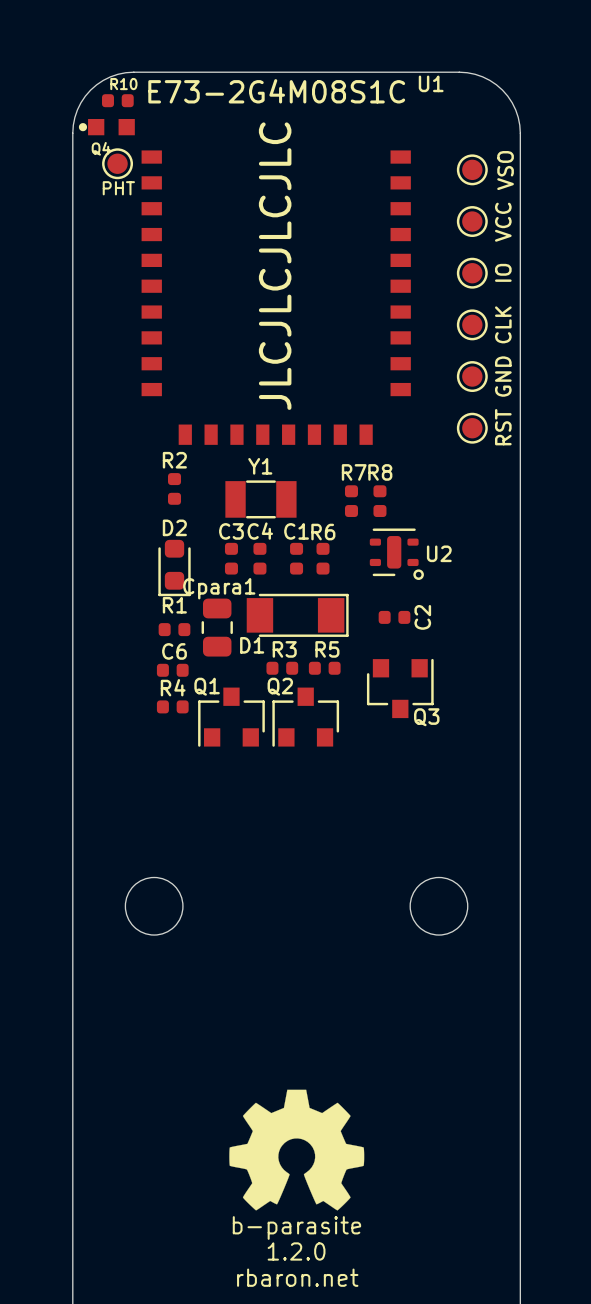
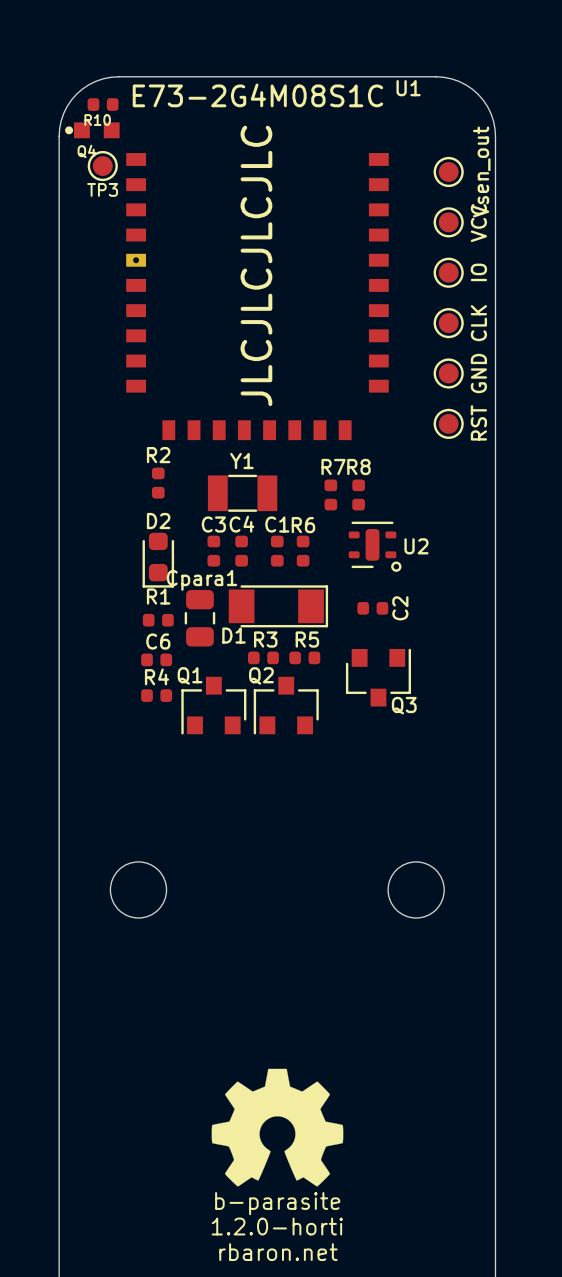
R10 name position: R10 (123, 84) -> R10 (97, 120)
U1 footprint: [141, 150, 411, 445] -> [126, 153, 389, 441]
part value: VSO (505, 170) -> Vsen_out (481, 171)
PHT name: PHT (118, 188) -> TP3 (102, 189)
text: 1.2.0 (296, 1251) -> 1.2.0-horti (277, 1226)

